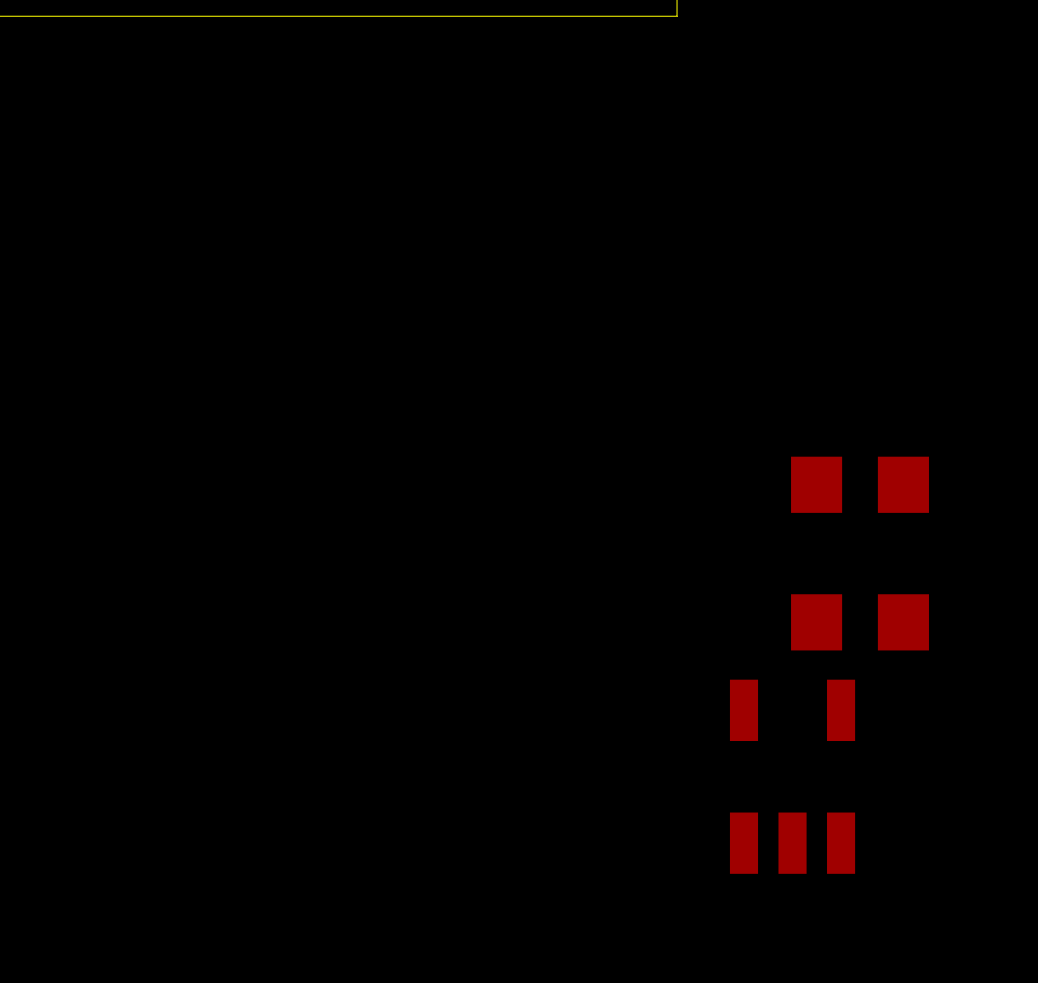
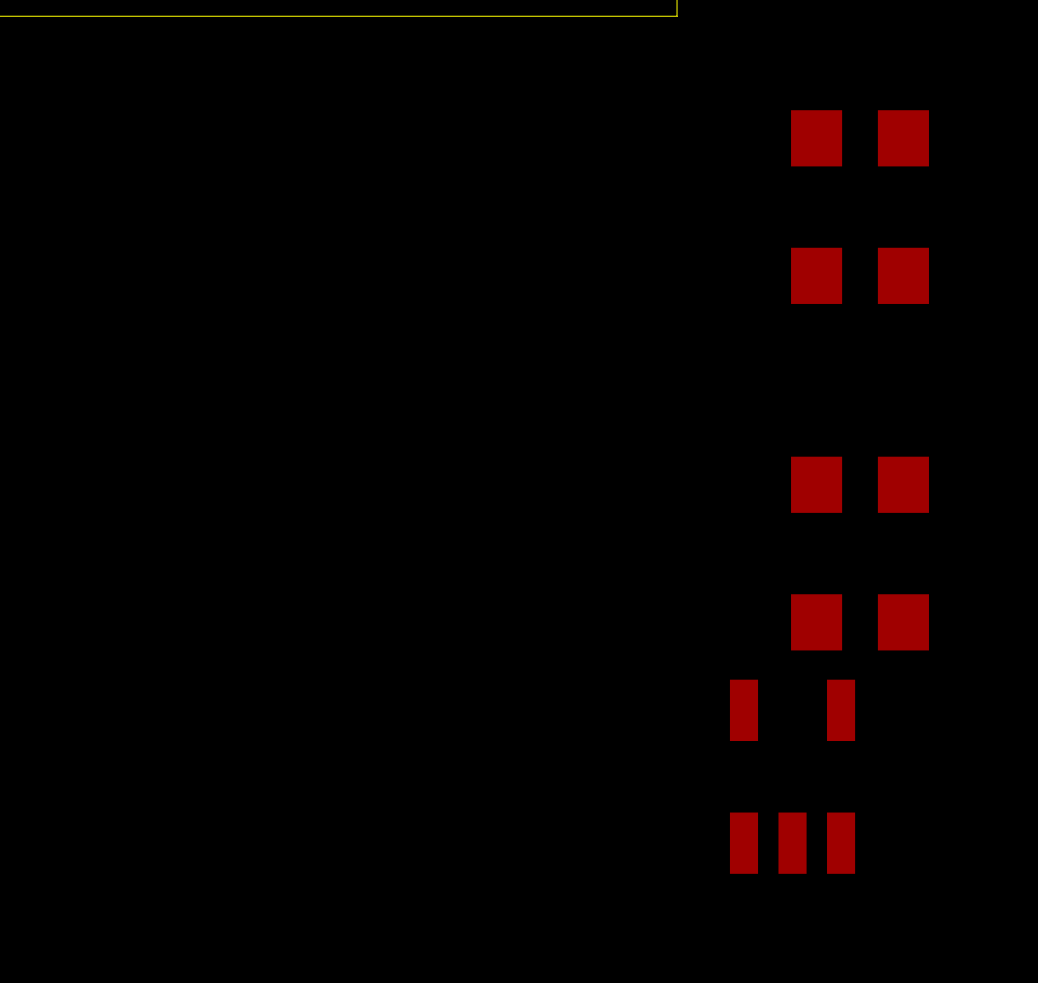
part: none -> (860, 138)
part: none -> (860, 275)

